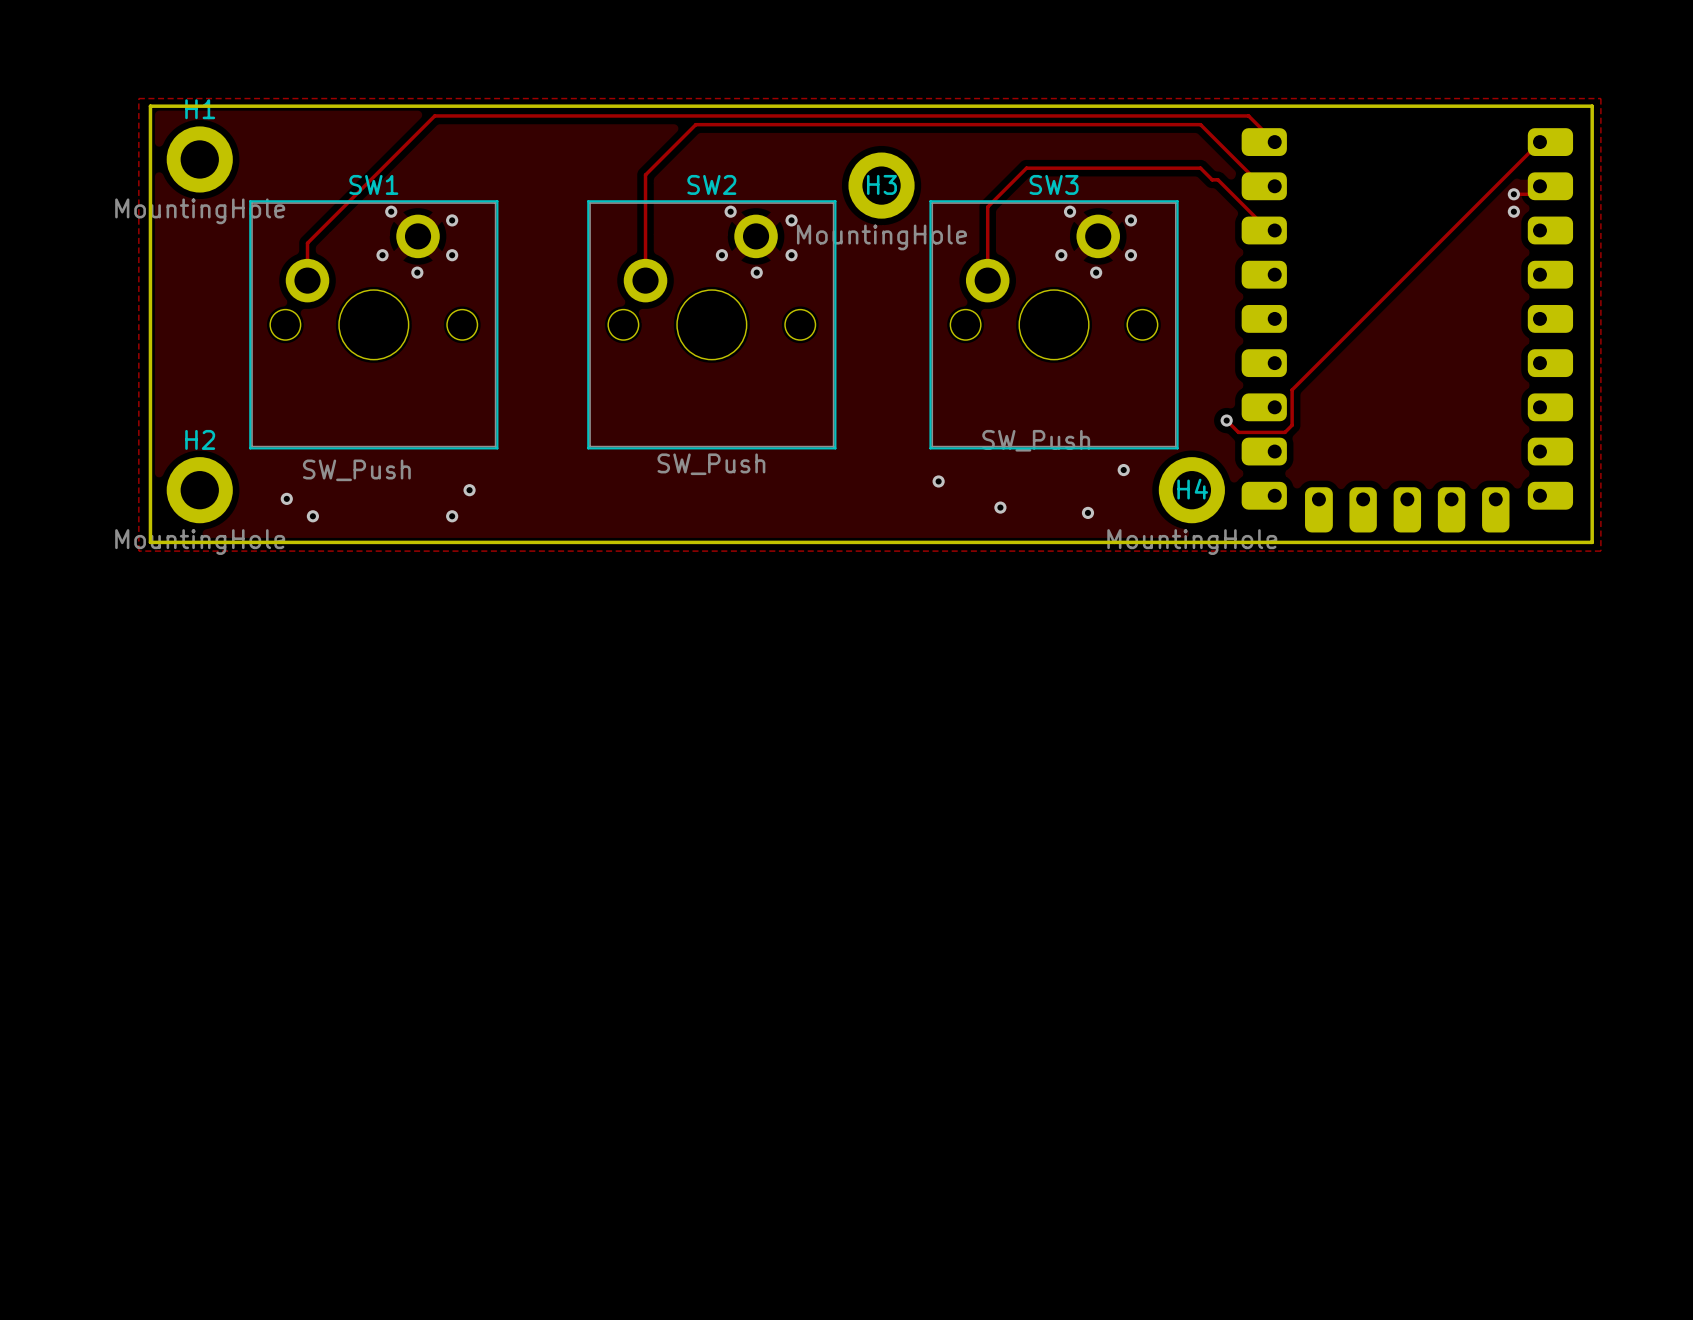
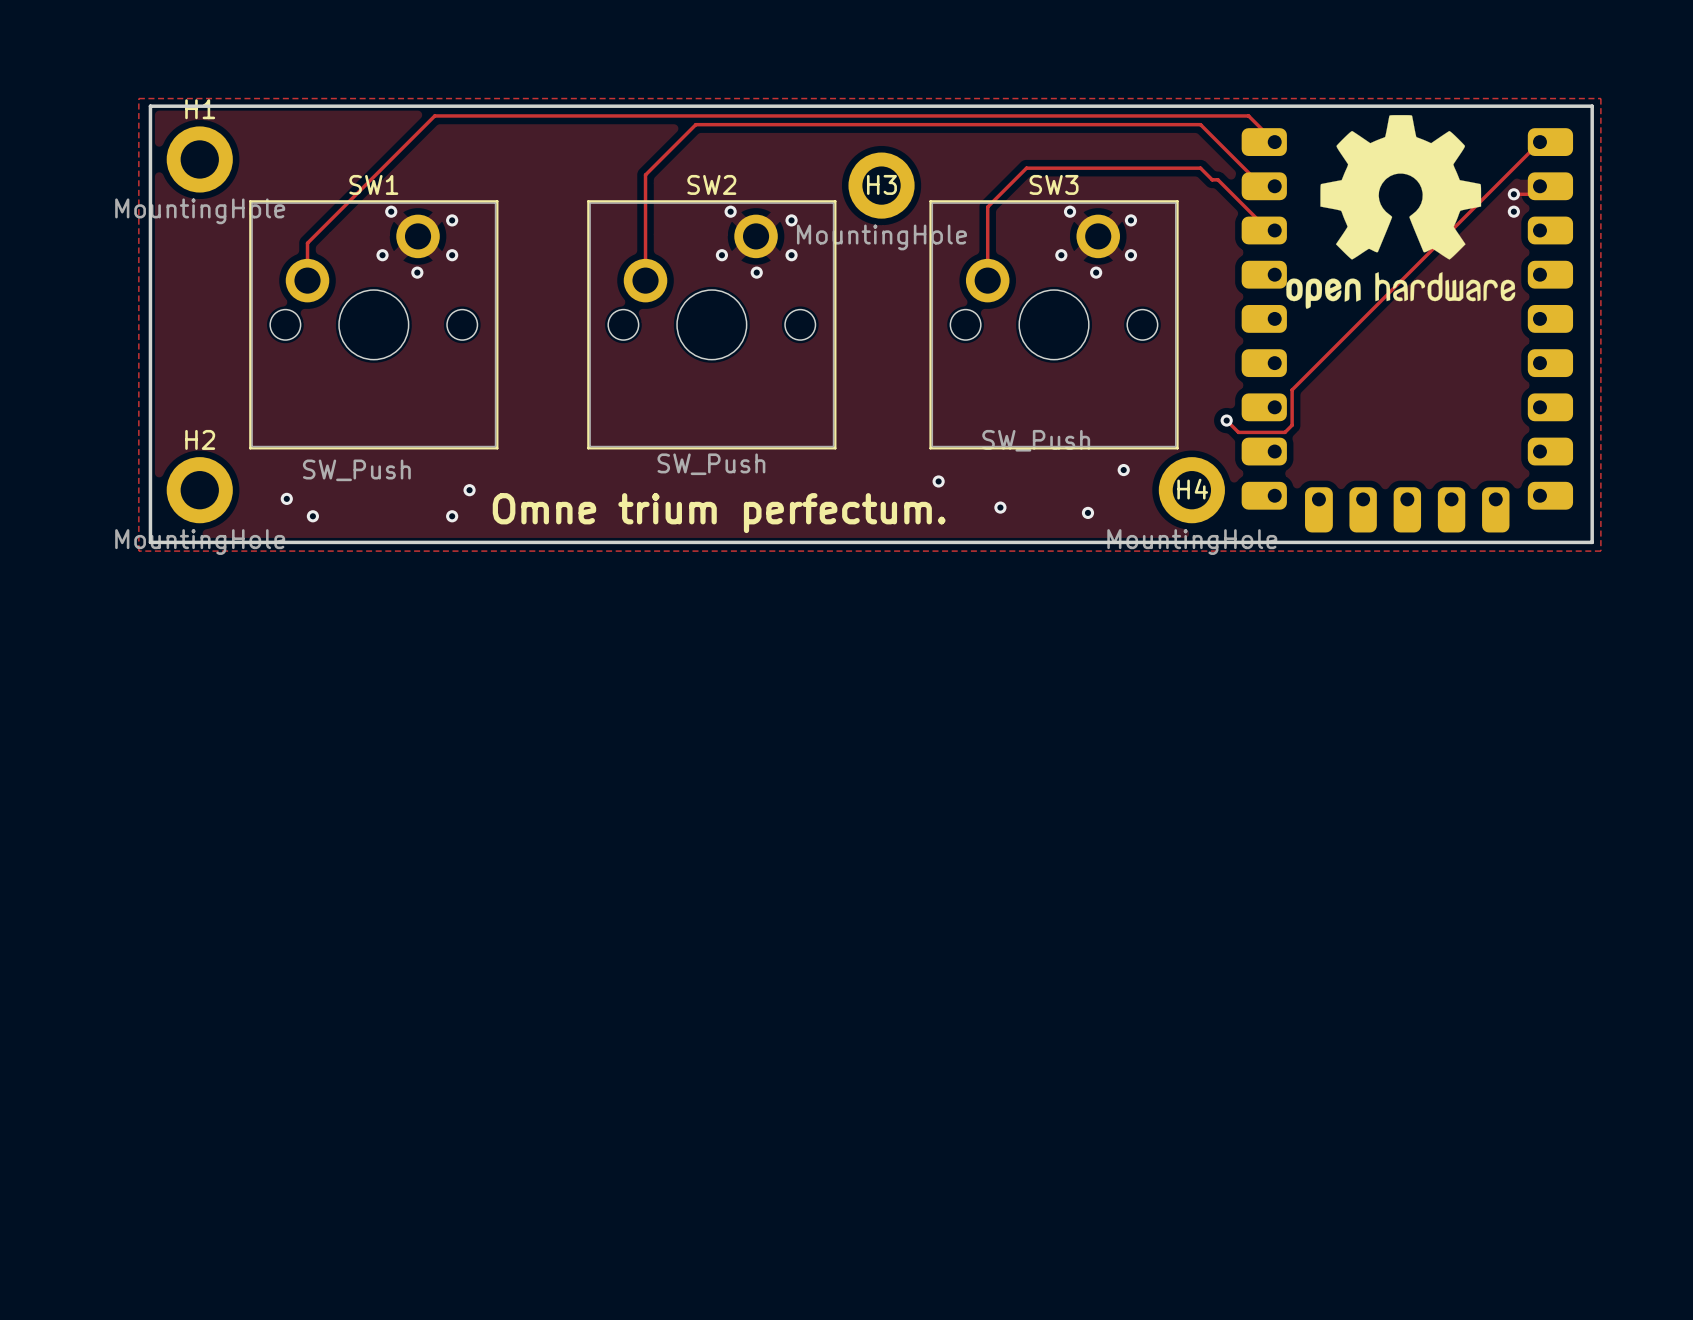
drawing: none -> [1286, 115, 1516, 309]
text: none -> Omne trium perfectum. (719, 513)

